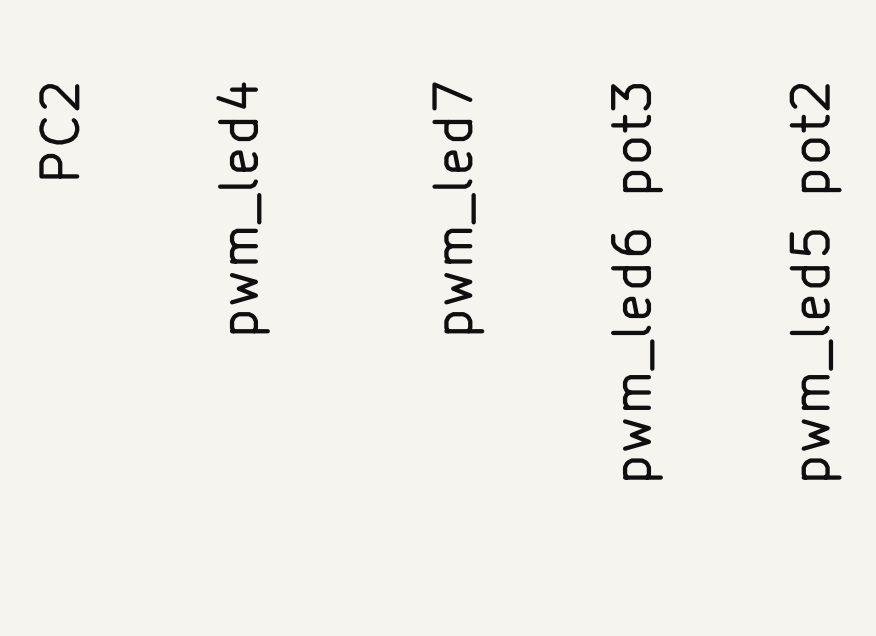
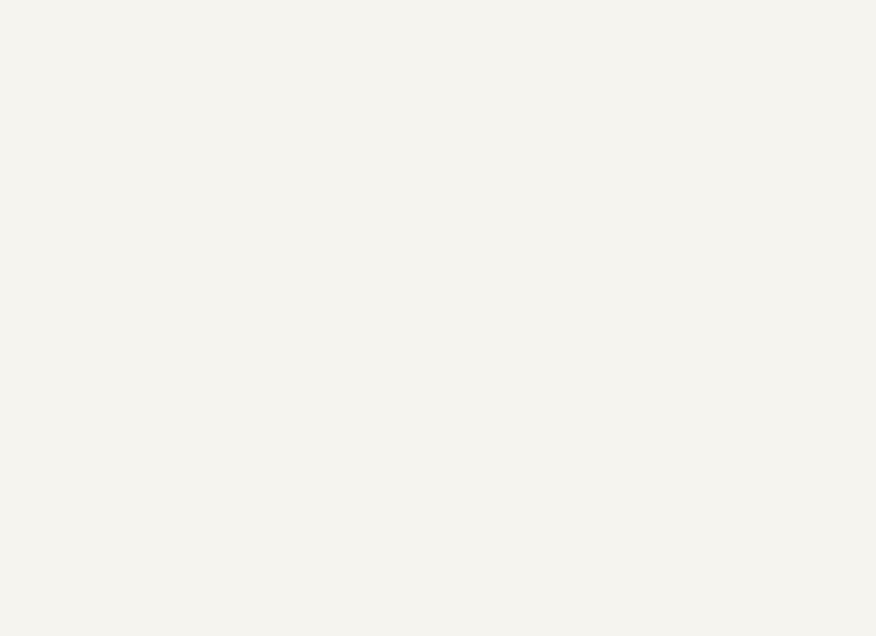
label: PC2 (59, 131) -> none
label: pwm_led4 (243, 207) -> none
label: pwm_led7 (458, 207) -> none
label: pwm_led6 pot3 (636, 281) -> none
label: pwm_led5 pot2 (815, 281) -> none

